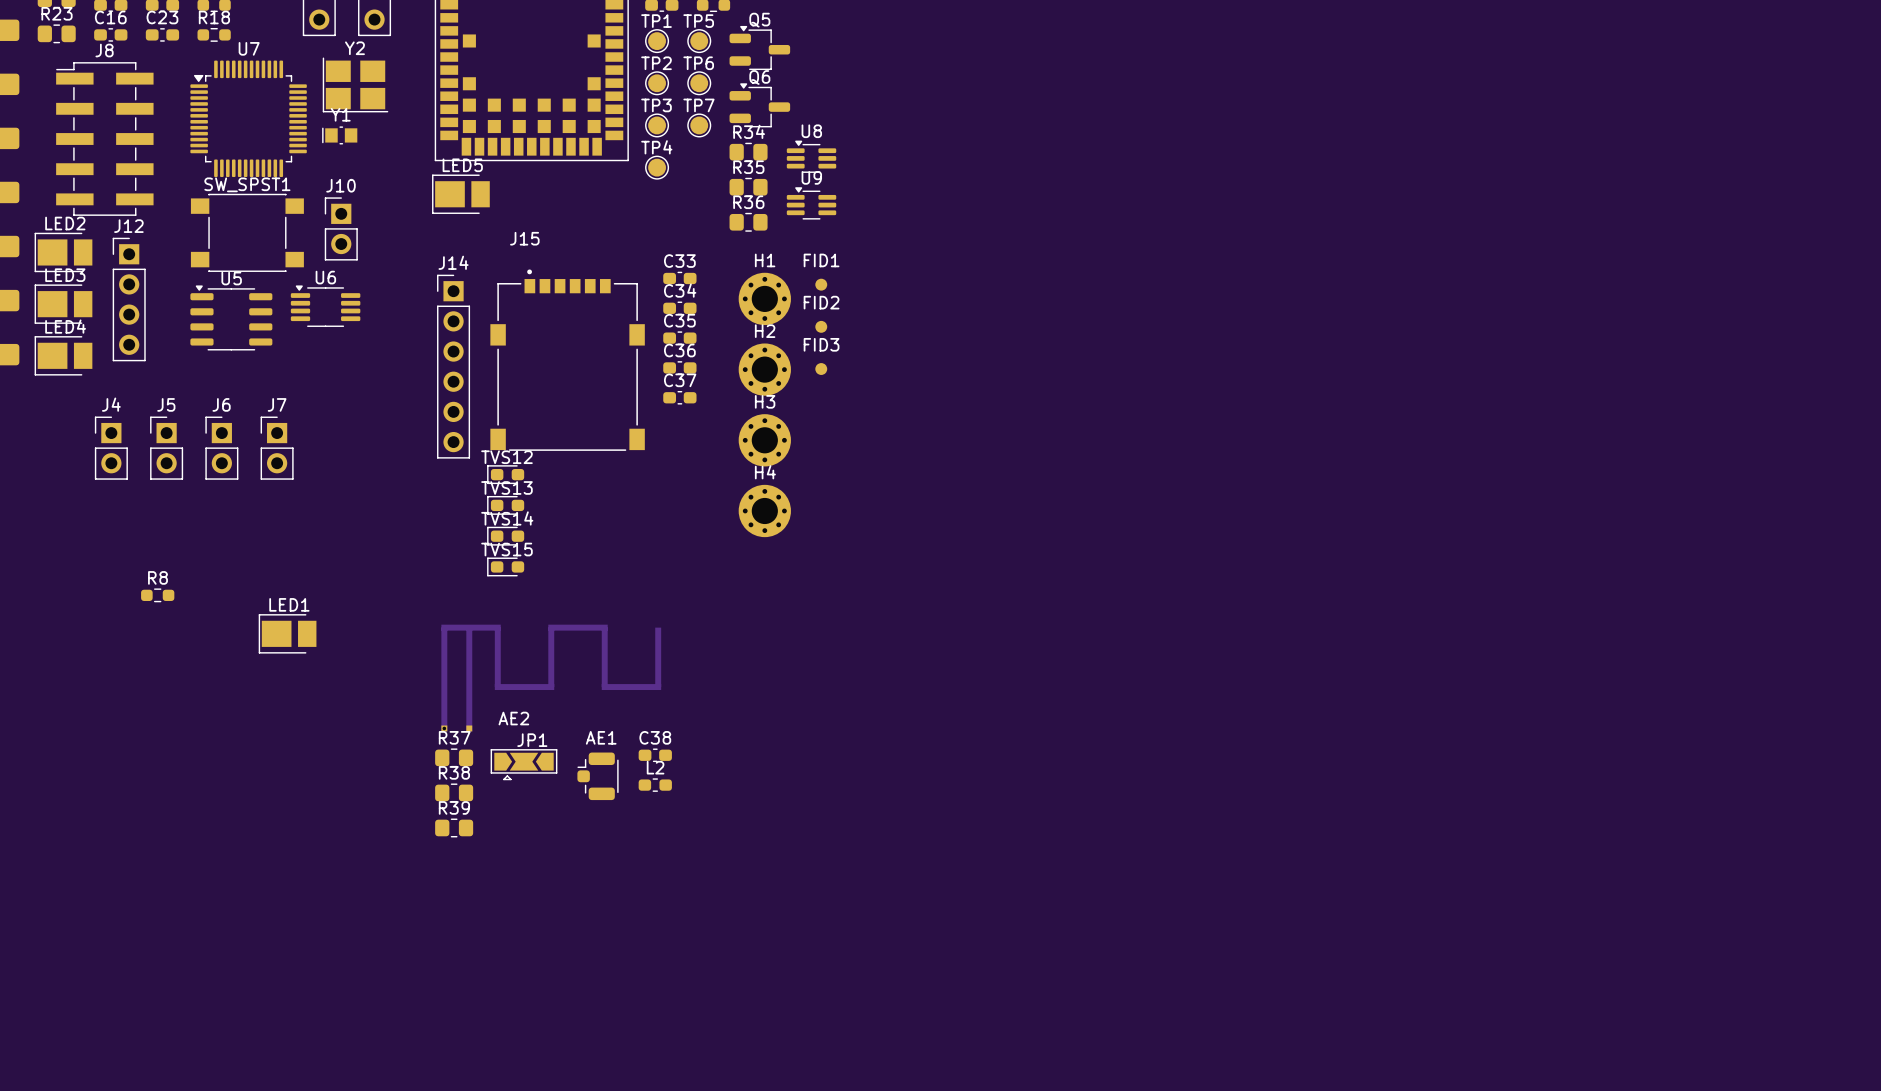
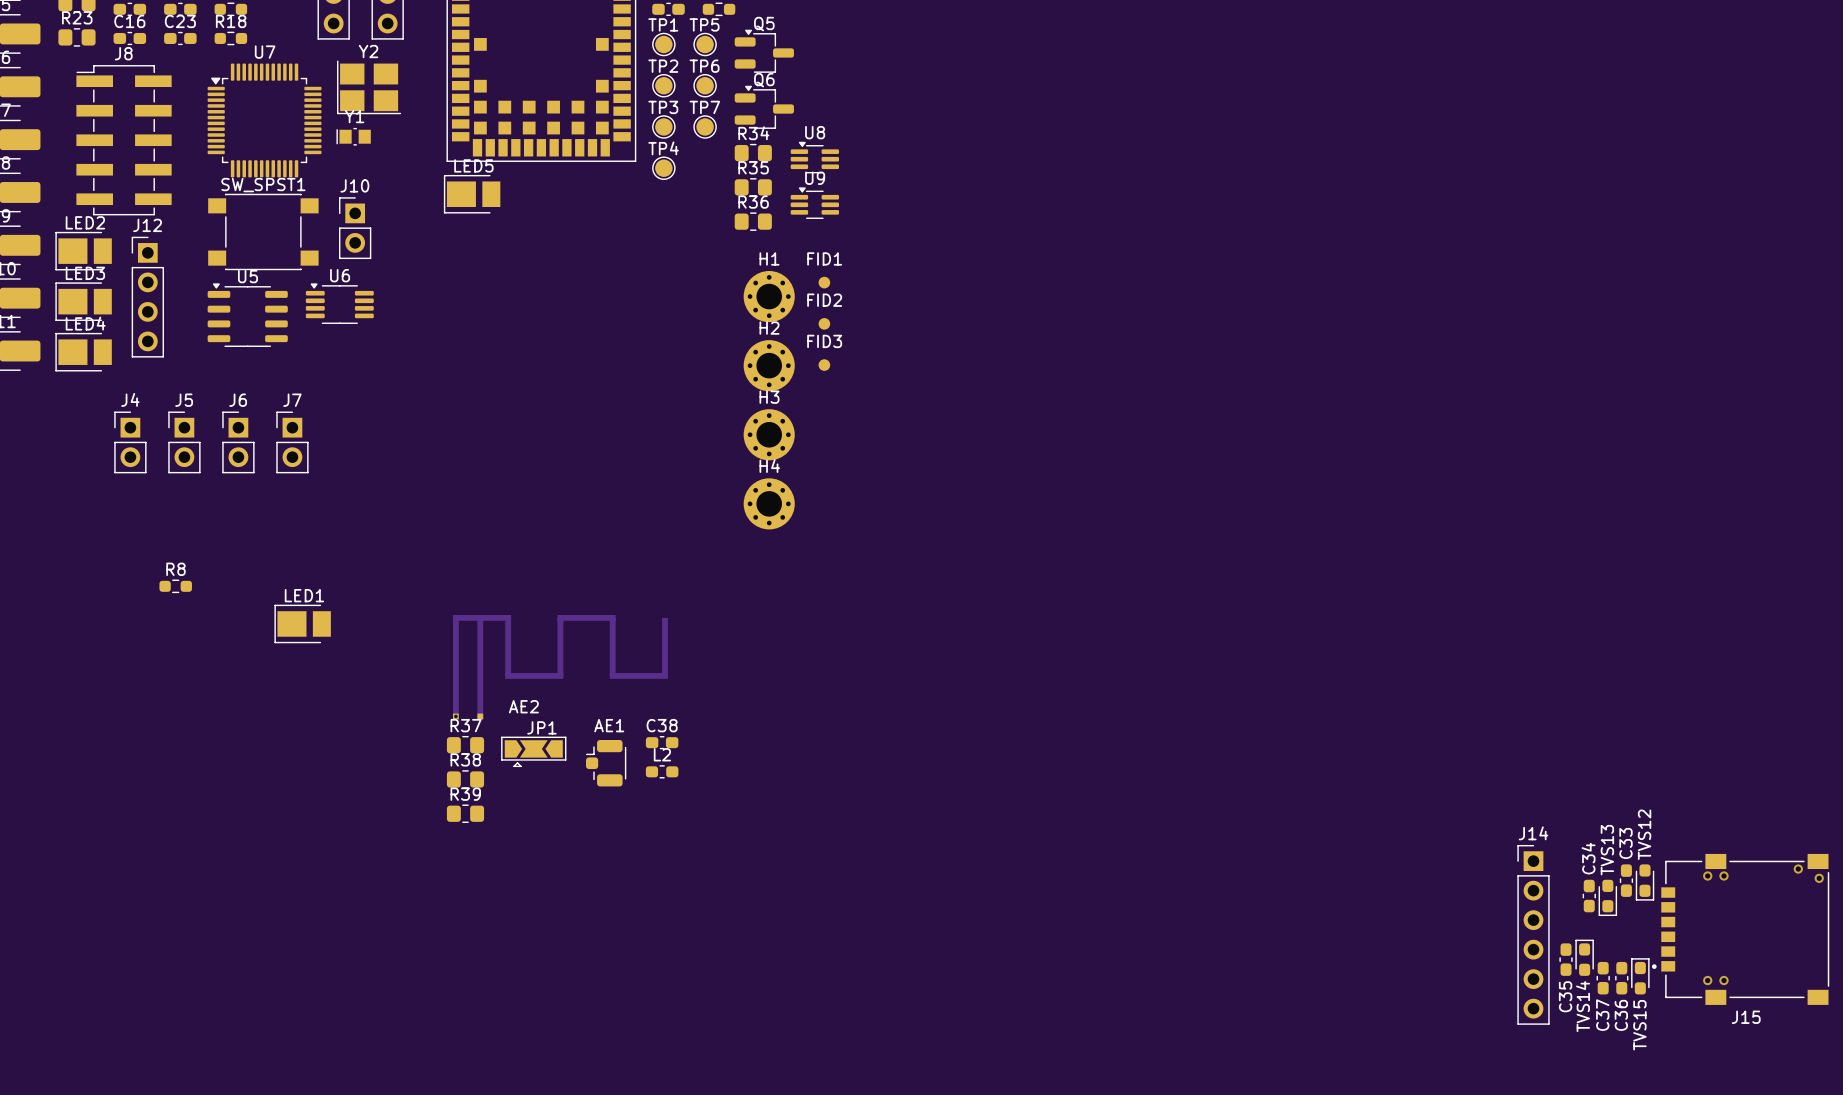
J15 name position: J15 (524, 238) -> J15 (1746, 1017)
C33 rotation: 0° (679, 278) -> 90° clockwise (1626, 880)
C33 position: (679, 278) -> (1626, 880)
C34 rotation: 0° (679, 308) -> 90° clockwise (1589, 896)
C34 position: (679, 308) -> (1589, 896)
C35 name position: C35 (679, 320) -> C35 (1565, 996)
C35 rotation: 0° (679, 338) -> 90° clockwise (1566, 959)
C35 position: (679, 338) -> (1566, 959)
C36 name position: C36 (679, 350) -> C36 (1621, 1015)
J15 rotation: 0° (567, 360) -> 90° counterclockwise (1740, 929)
J15 position: (567, 360) -> (1740, 929)
J14 position: (453, 366) -> (1533, 934)
C36 rotation: 0° (679, 367) -> 90° clockwise (1621, 978)
C36 position: (679, 367) -> (1621, 978)
C37 name position: C37 (680, 380) -> C37 (1602, 1015)
C37 rotation: 0° (679, 397) -> 90° clockwise (1603, 978)
C37 position: (679, 397) -> (1603, 978)
TVS12 name position: TVS12 (506, 457) -> TVS12 (1644, 834)
TVS12 rotation: 0° (505, 474) -> 90° counterclockwise (1645, 882)
TVS12 position: (505, 474) -> (1645, 882)
TVS13 name position: TVS13 (506, 487) -> TVS13 (1607, 850)
TVS13 rotation: 0° (505, 505) -> 90° counterclockwise (1607, 897)
TVS13 position: (505, 505) -> (1607, 897)
TVS14 name position: TVS14 (507, 518) -> TVS14 (1583, 1006)
TVS14 rotation: 0° (505, 536) -> 90° clockwise (1584, 957)
TVS14 position: (505, 536) -> (1584, 957)
TVS15 name position: TVS15 (506, 549) -> TVS15 (1639, 1025)
TVS15 rotation: 0° (505, 566) -> 90° clockwise (1640, 976)
TVS15 position: (505, 566) -> (1640, 976)
via: none -> (1798, 869)
via: none -> (1707, 876)
via: none -> (1723, 876)
via: none -> (1819, 878)
via: none -> (1707, 980)
via: none -> (1723, 980)

